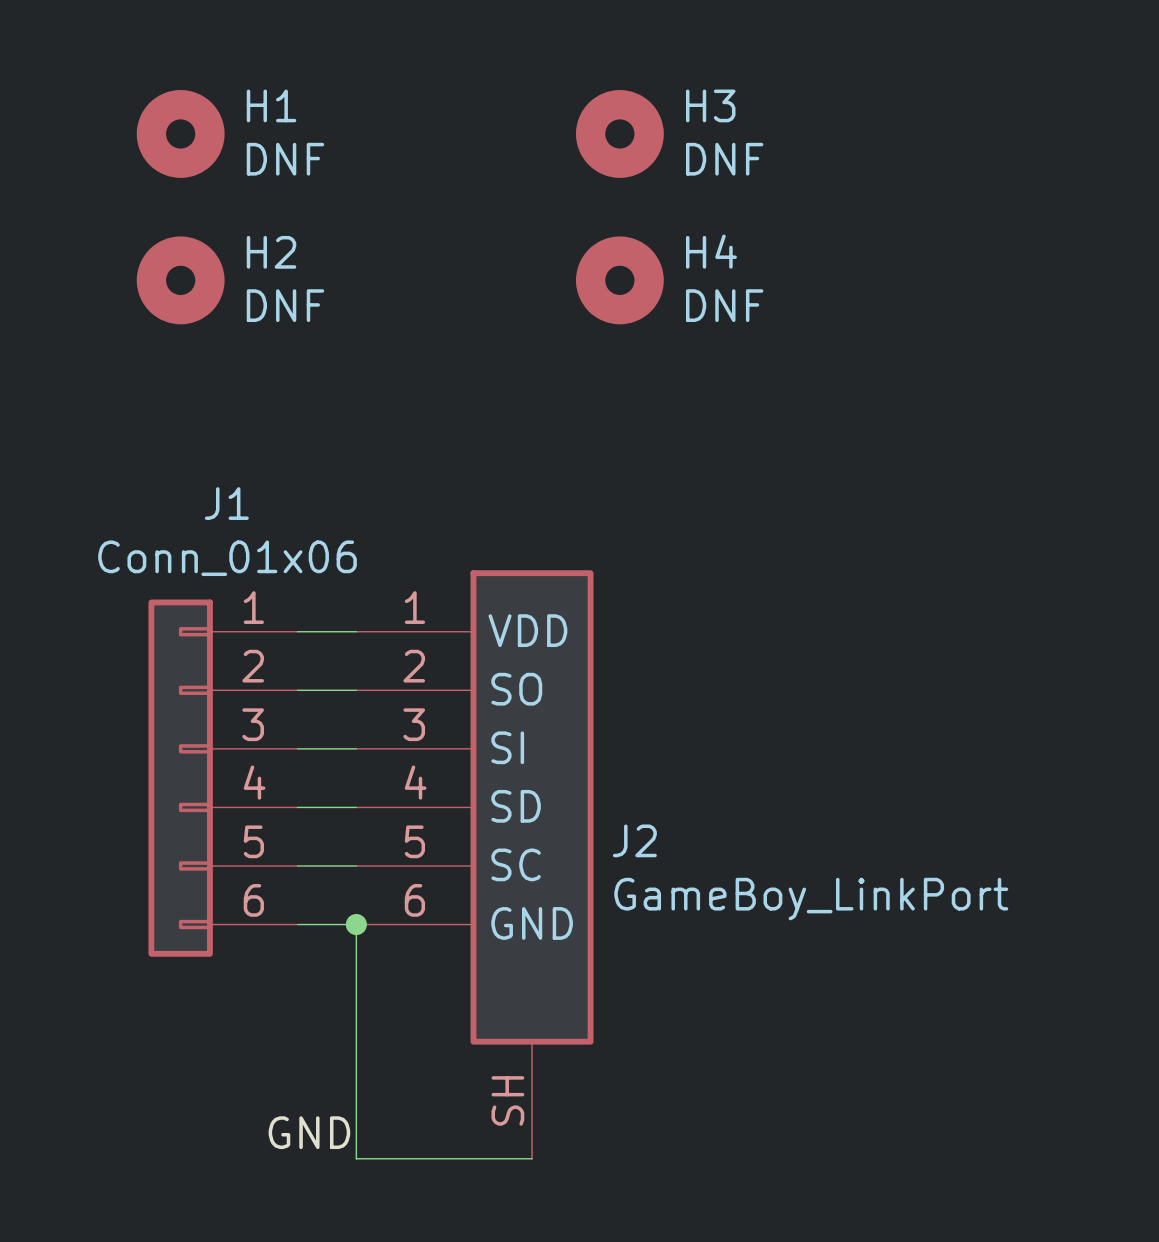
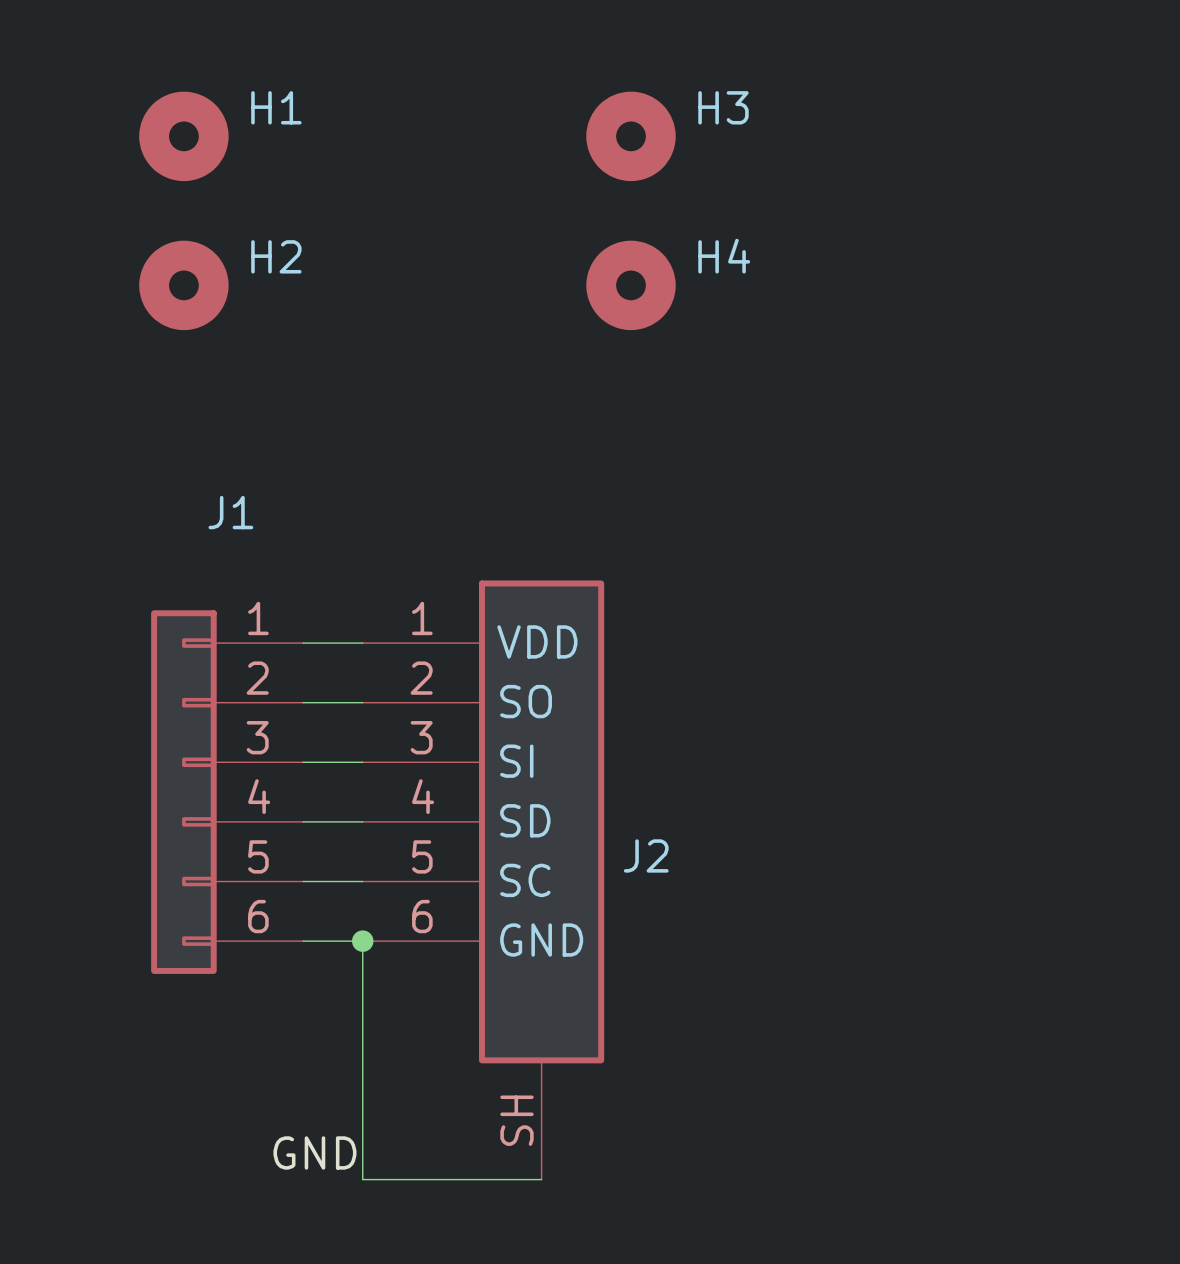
H1 value: DNF (285, 159) -> none
H3 value: DNF (724, 159) -> none
H2 value: DNF (285, 305) -> none
H4 value: DNF (724, 305) -> none
J1 value: Conn_01x06 (227, 558) -> none
J2 value: GameBoy_LinkPort (811, 899) -> none

